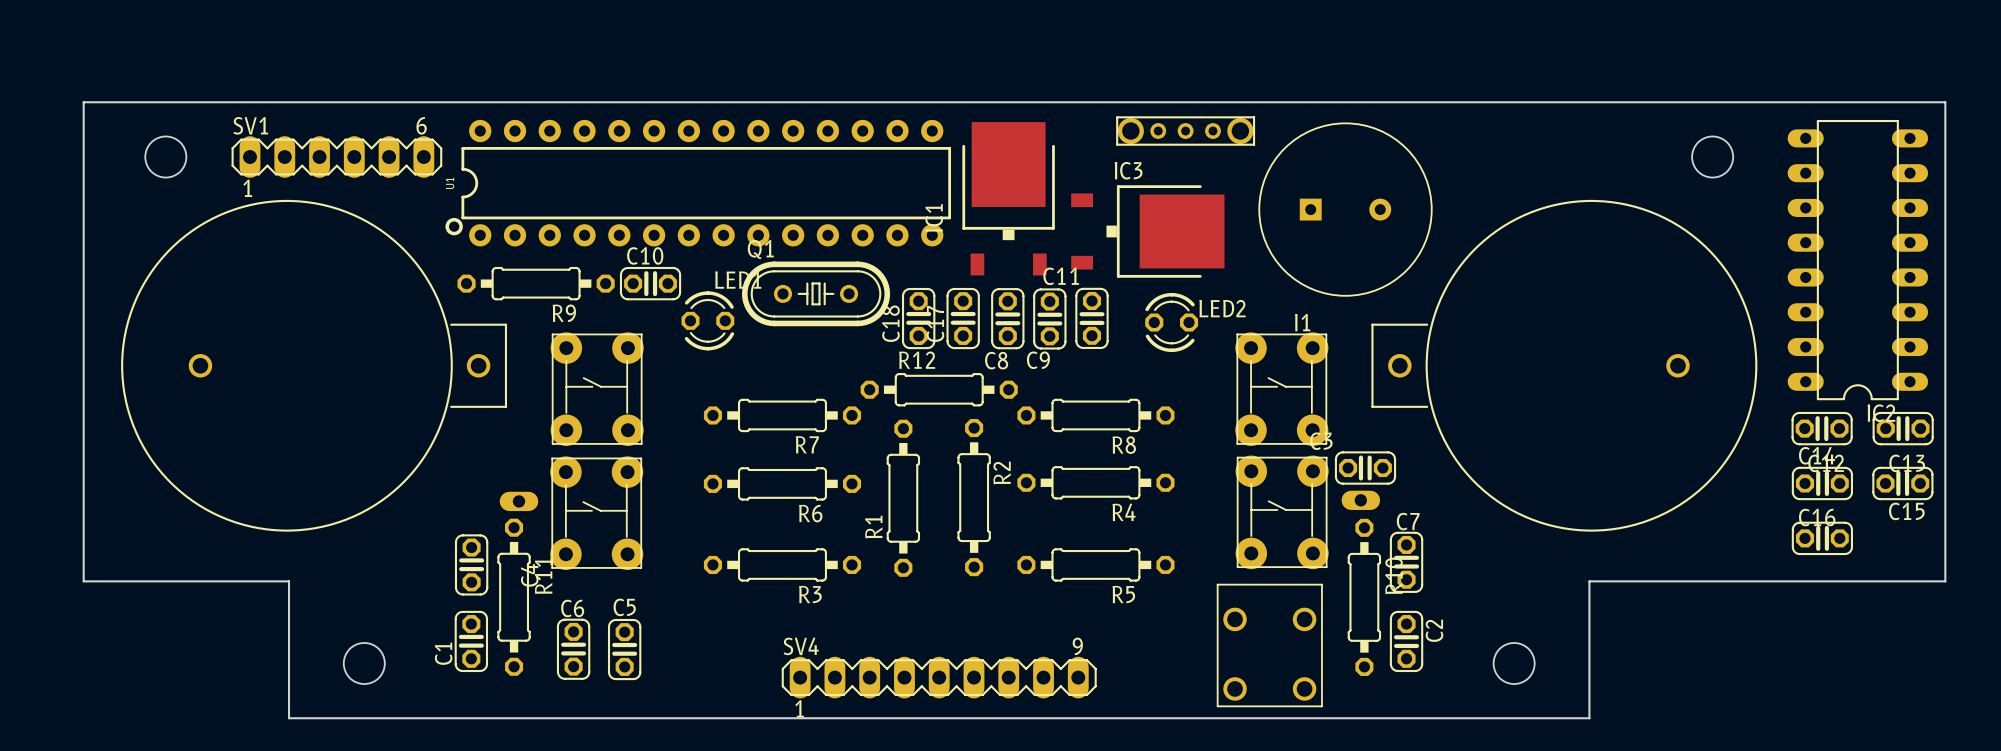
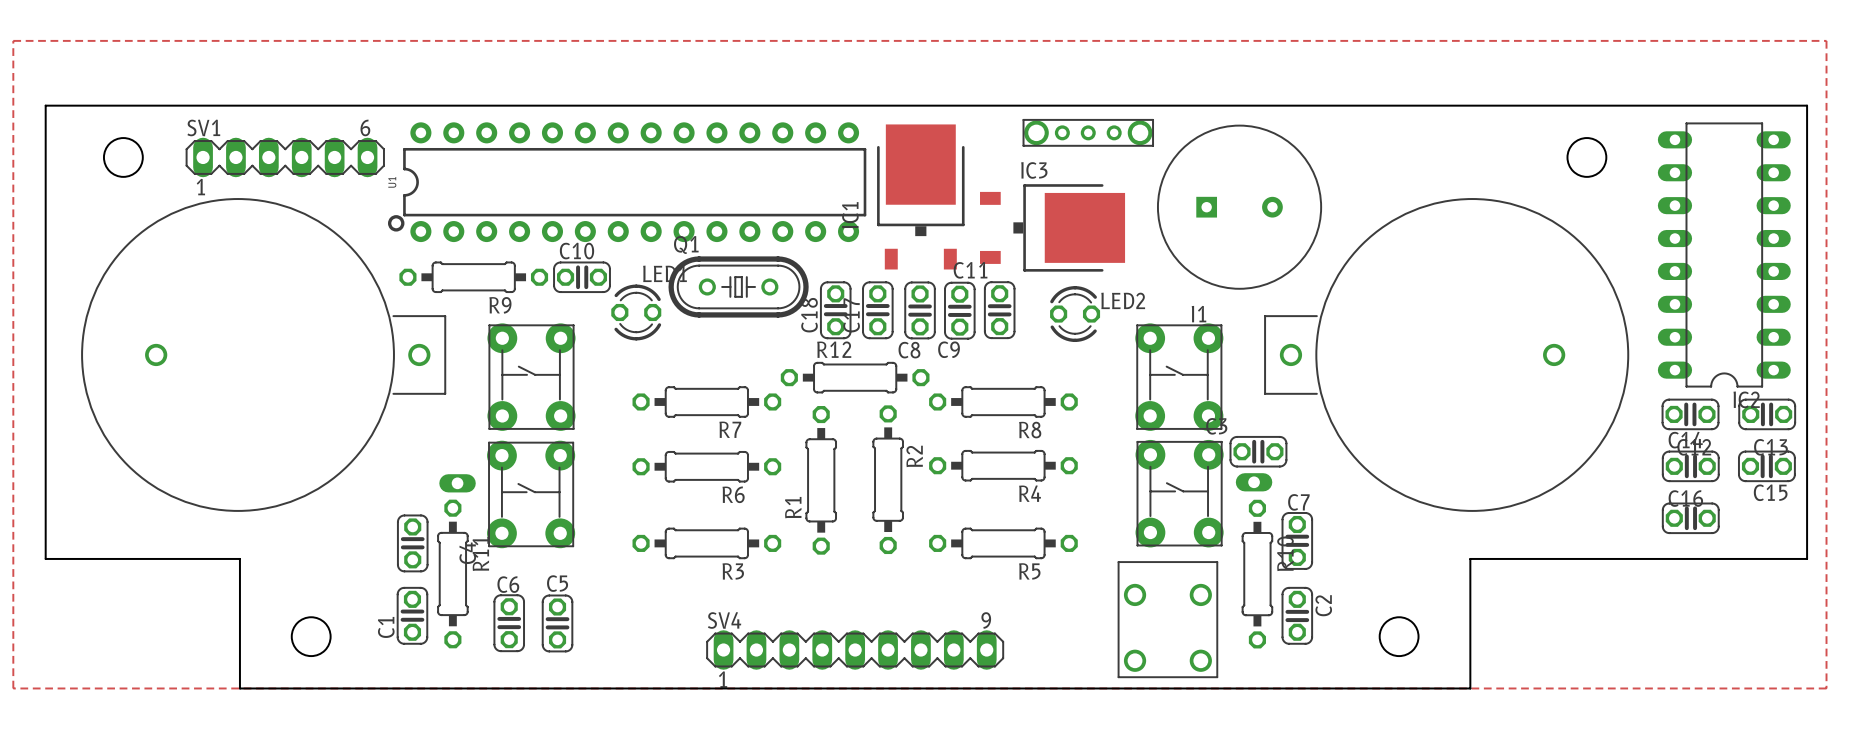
zone outline: none -> (13, 40) (1826, 40) (1826, 688) (13, 688) (13, 40)

